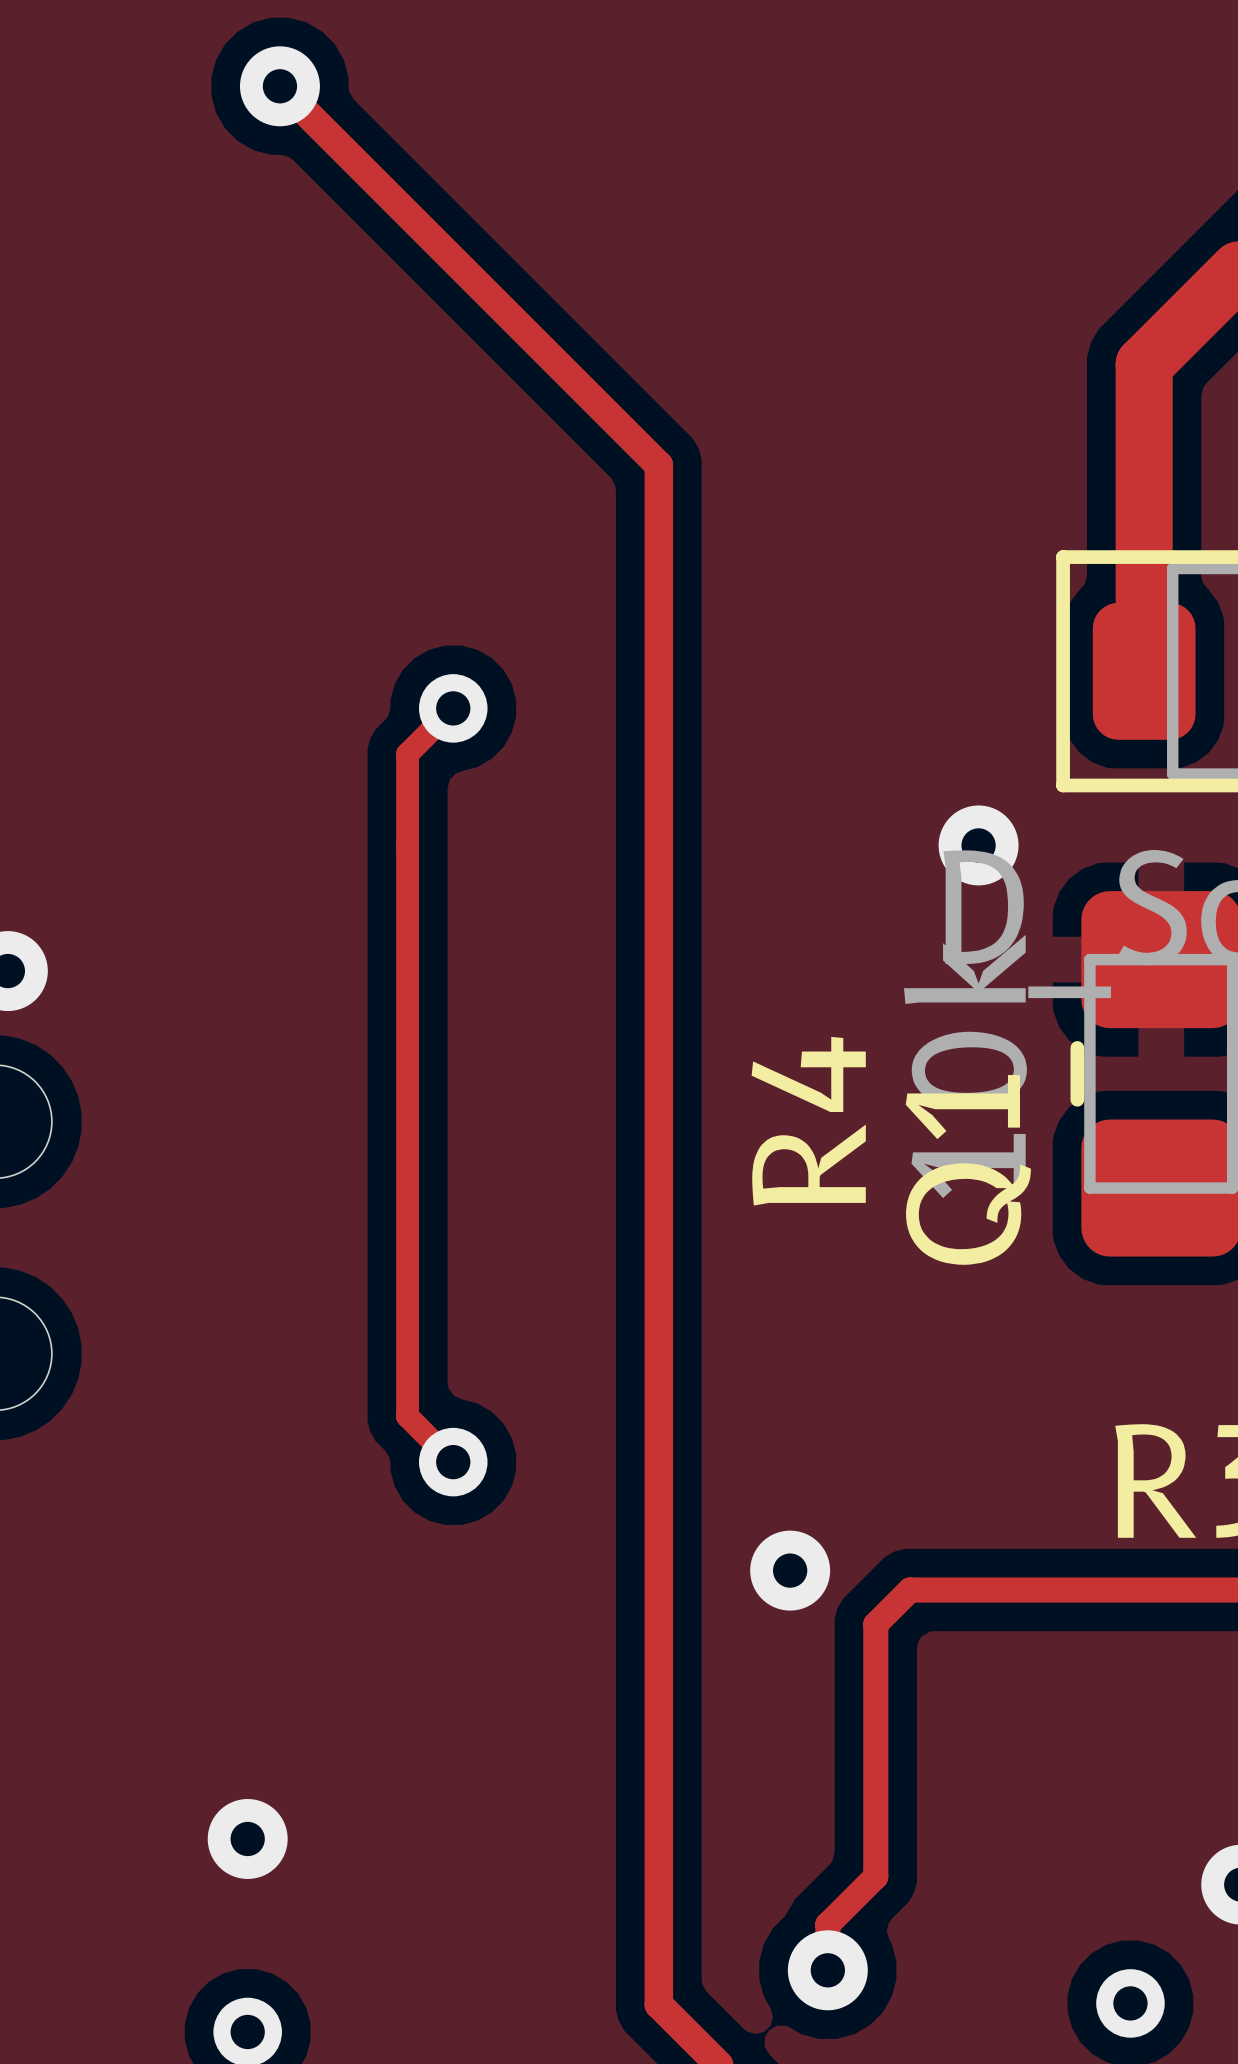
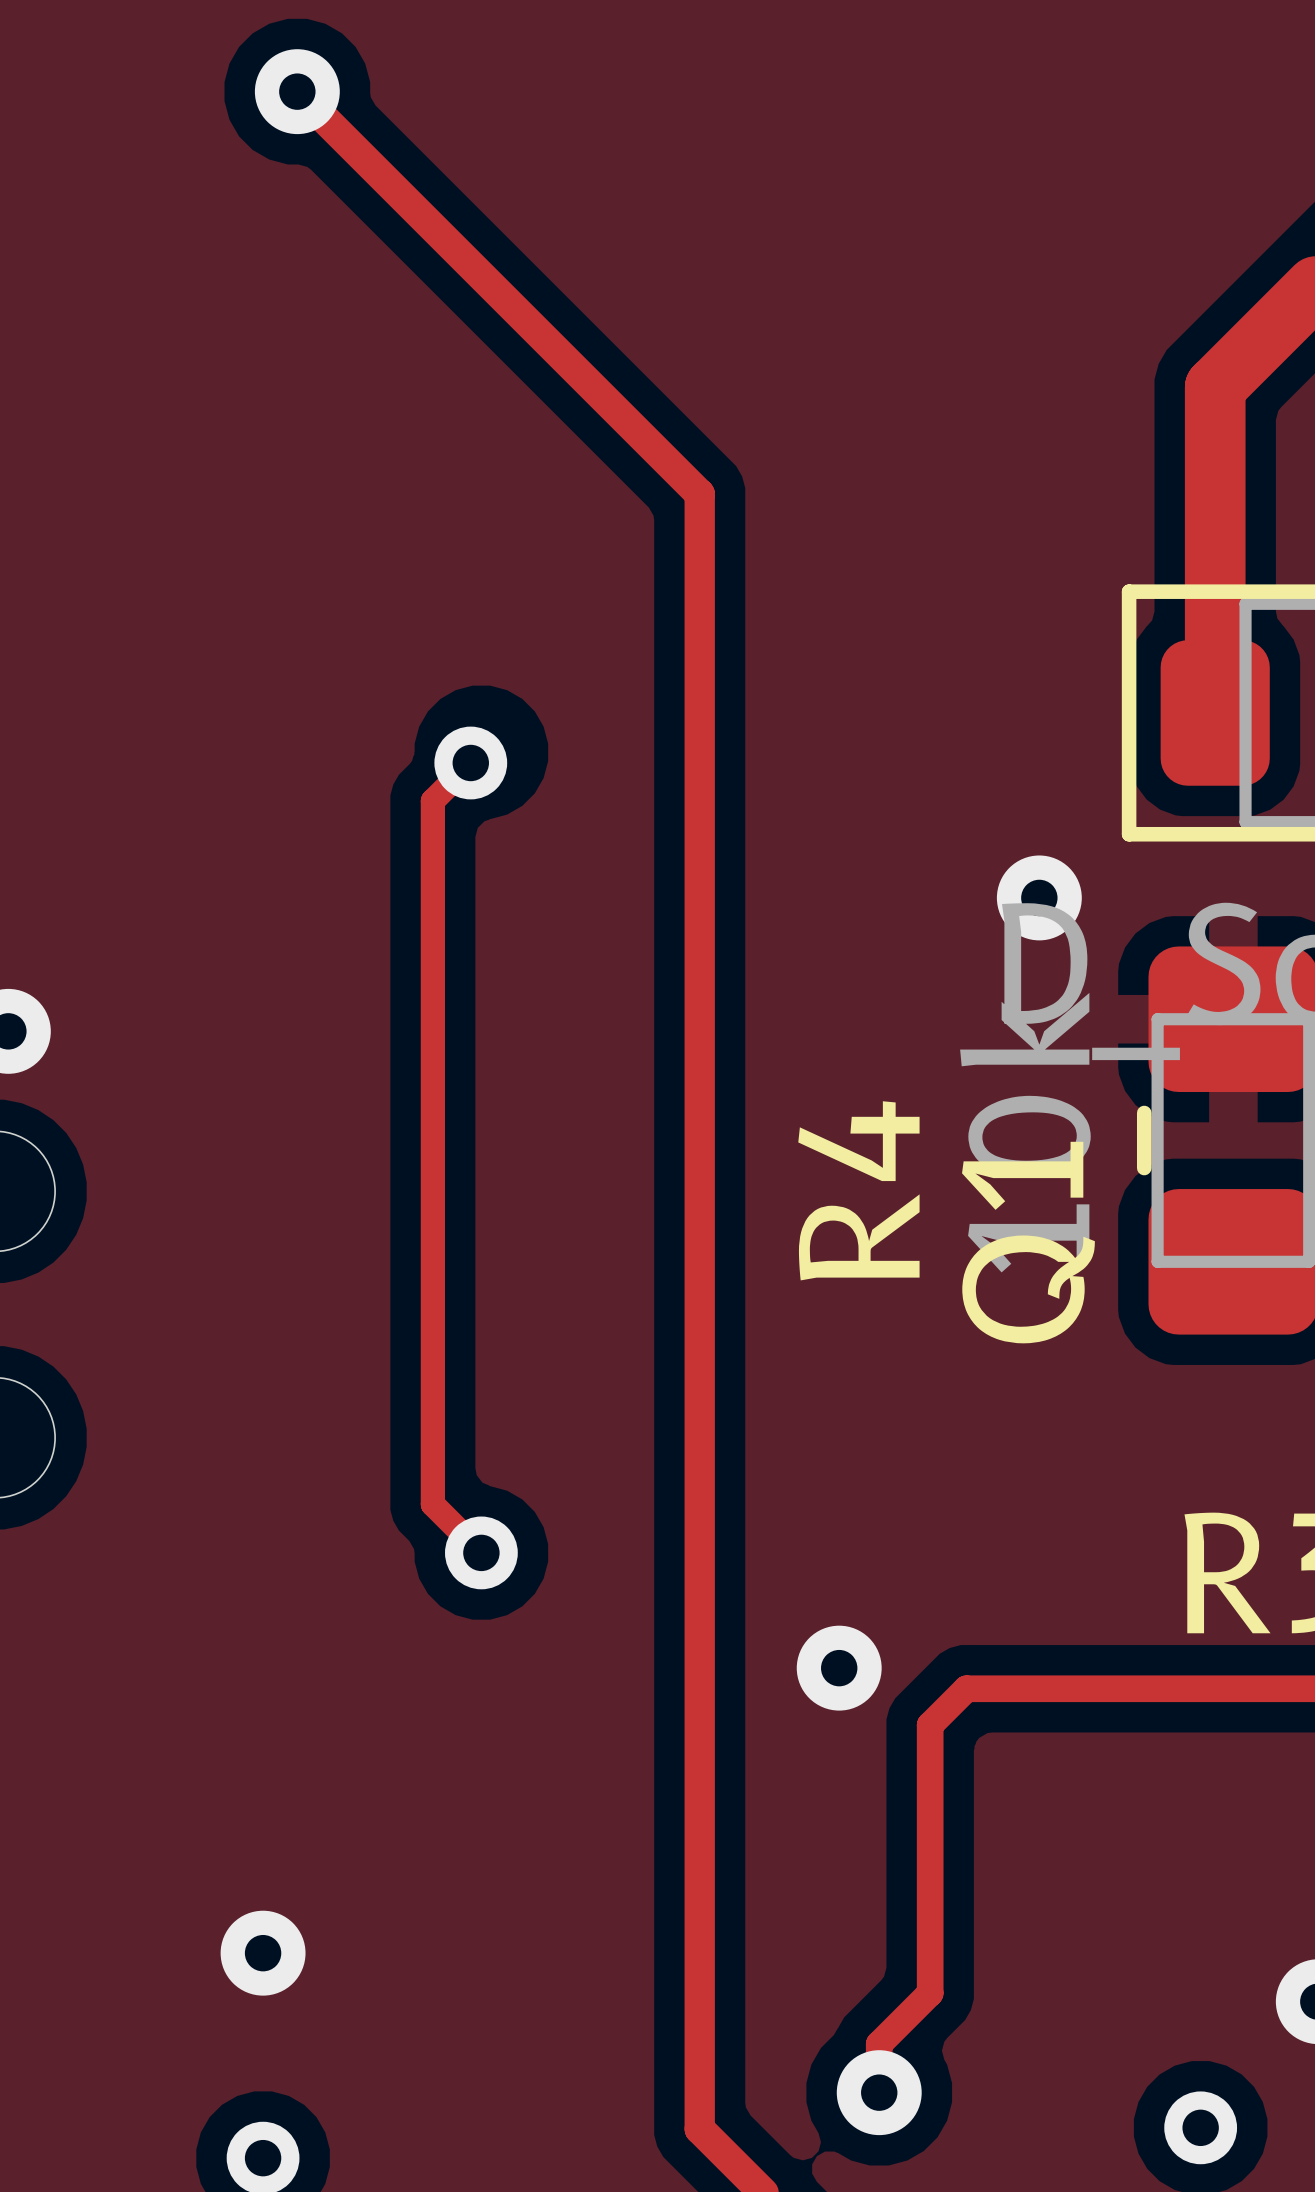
via position: (453, 708) -> (470, 763)

